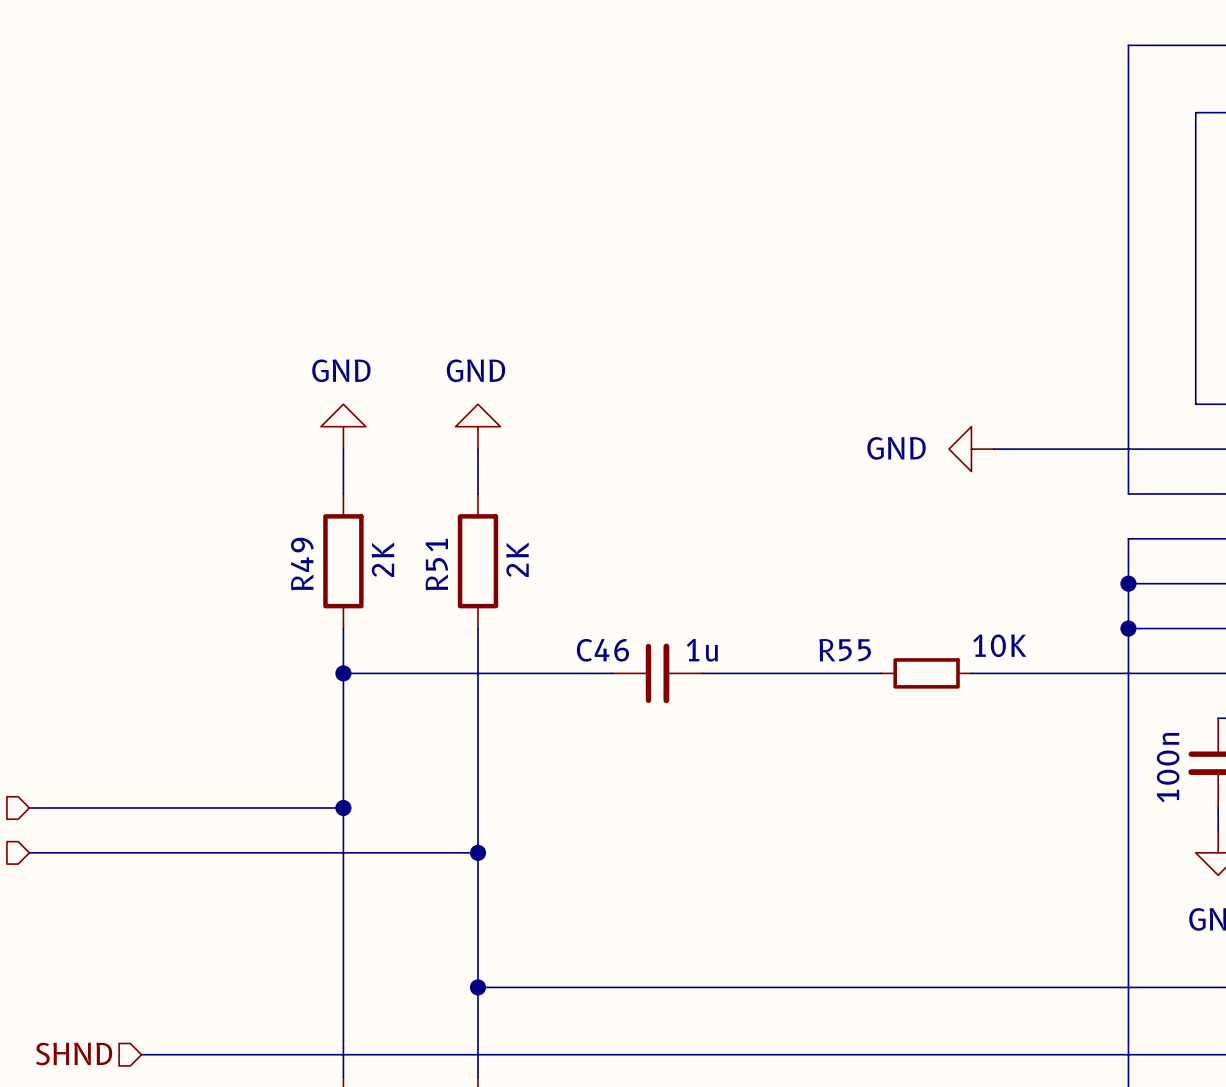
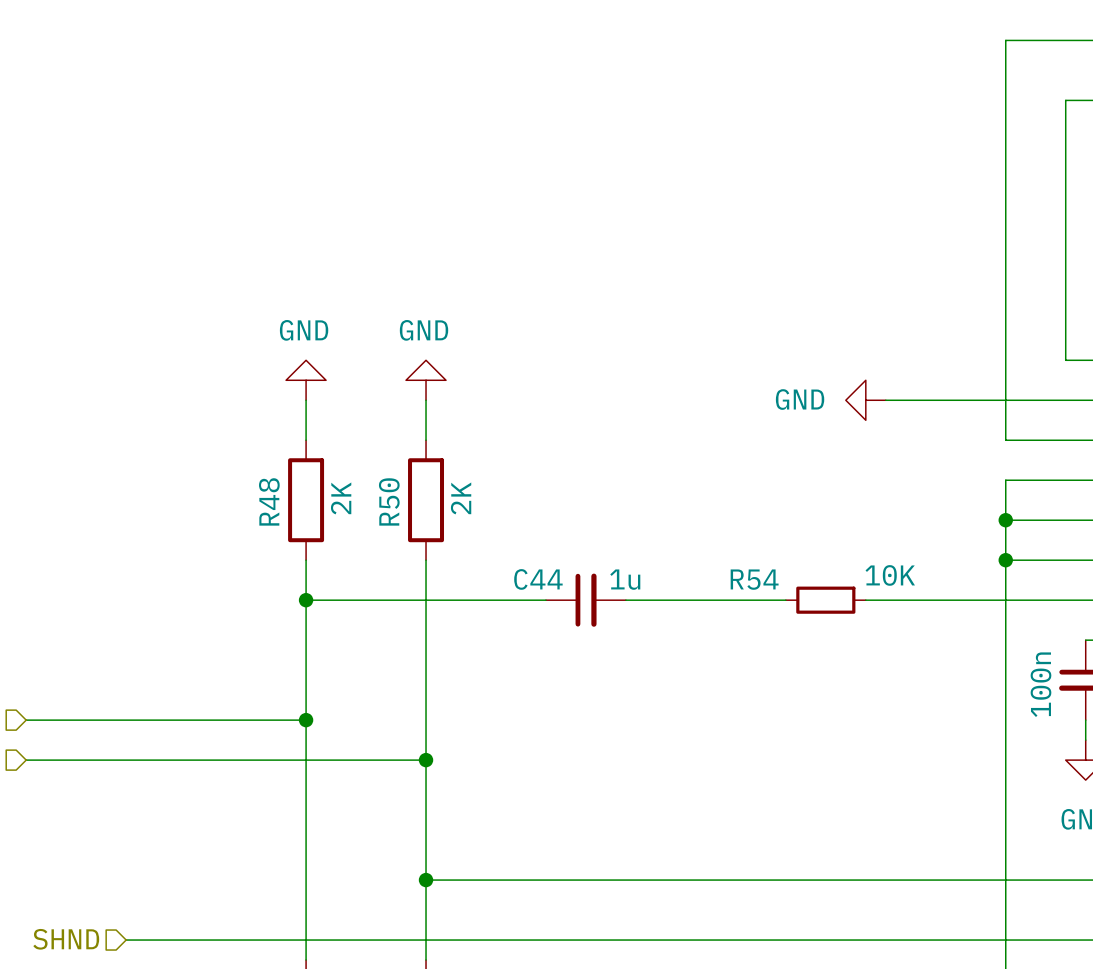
R49 name: R49 (302, 564) -> R48 (269, 501)
R51 name: R51 (436, 564) -> R50 (389, 501)
C46 name: C46 (602, 650) -> C44 (538, 579)
R55 name: R55 (845, 650) -> R54 (754, 579)

